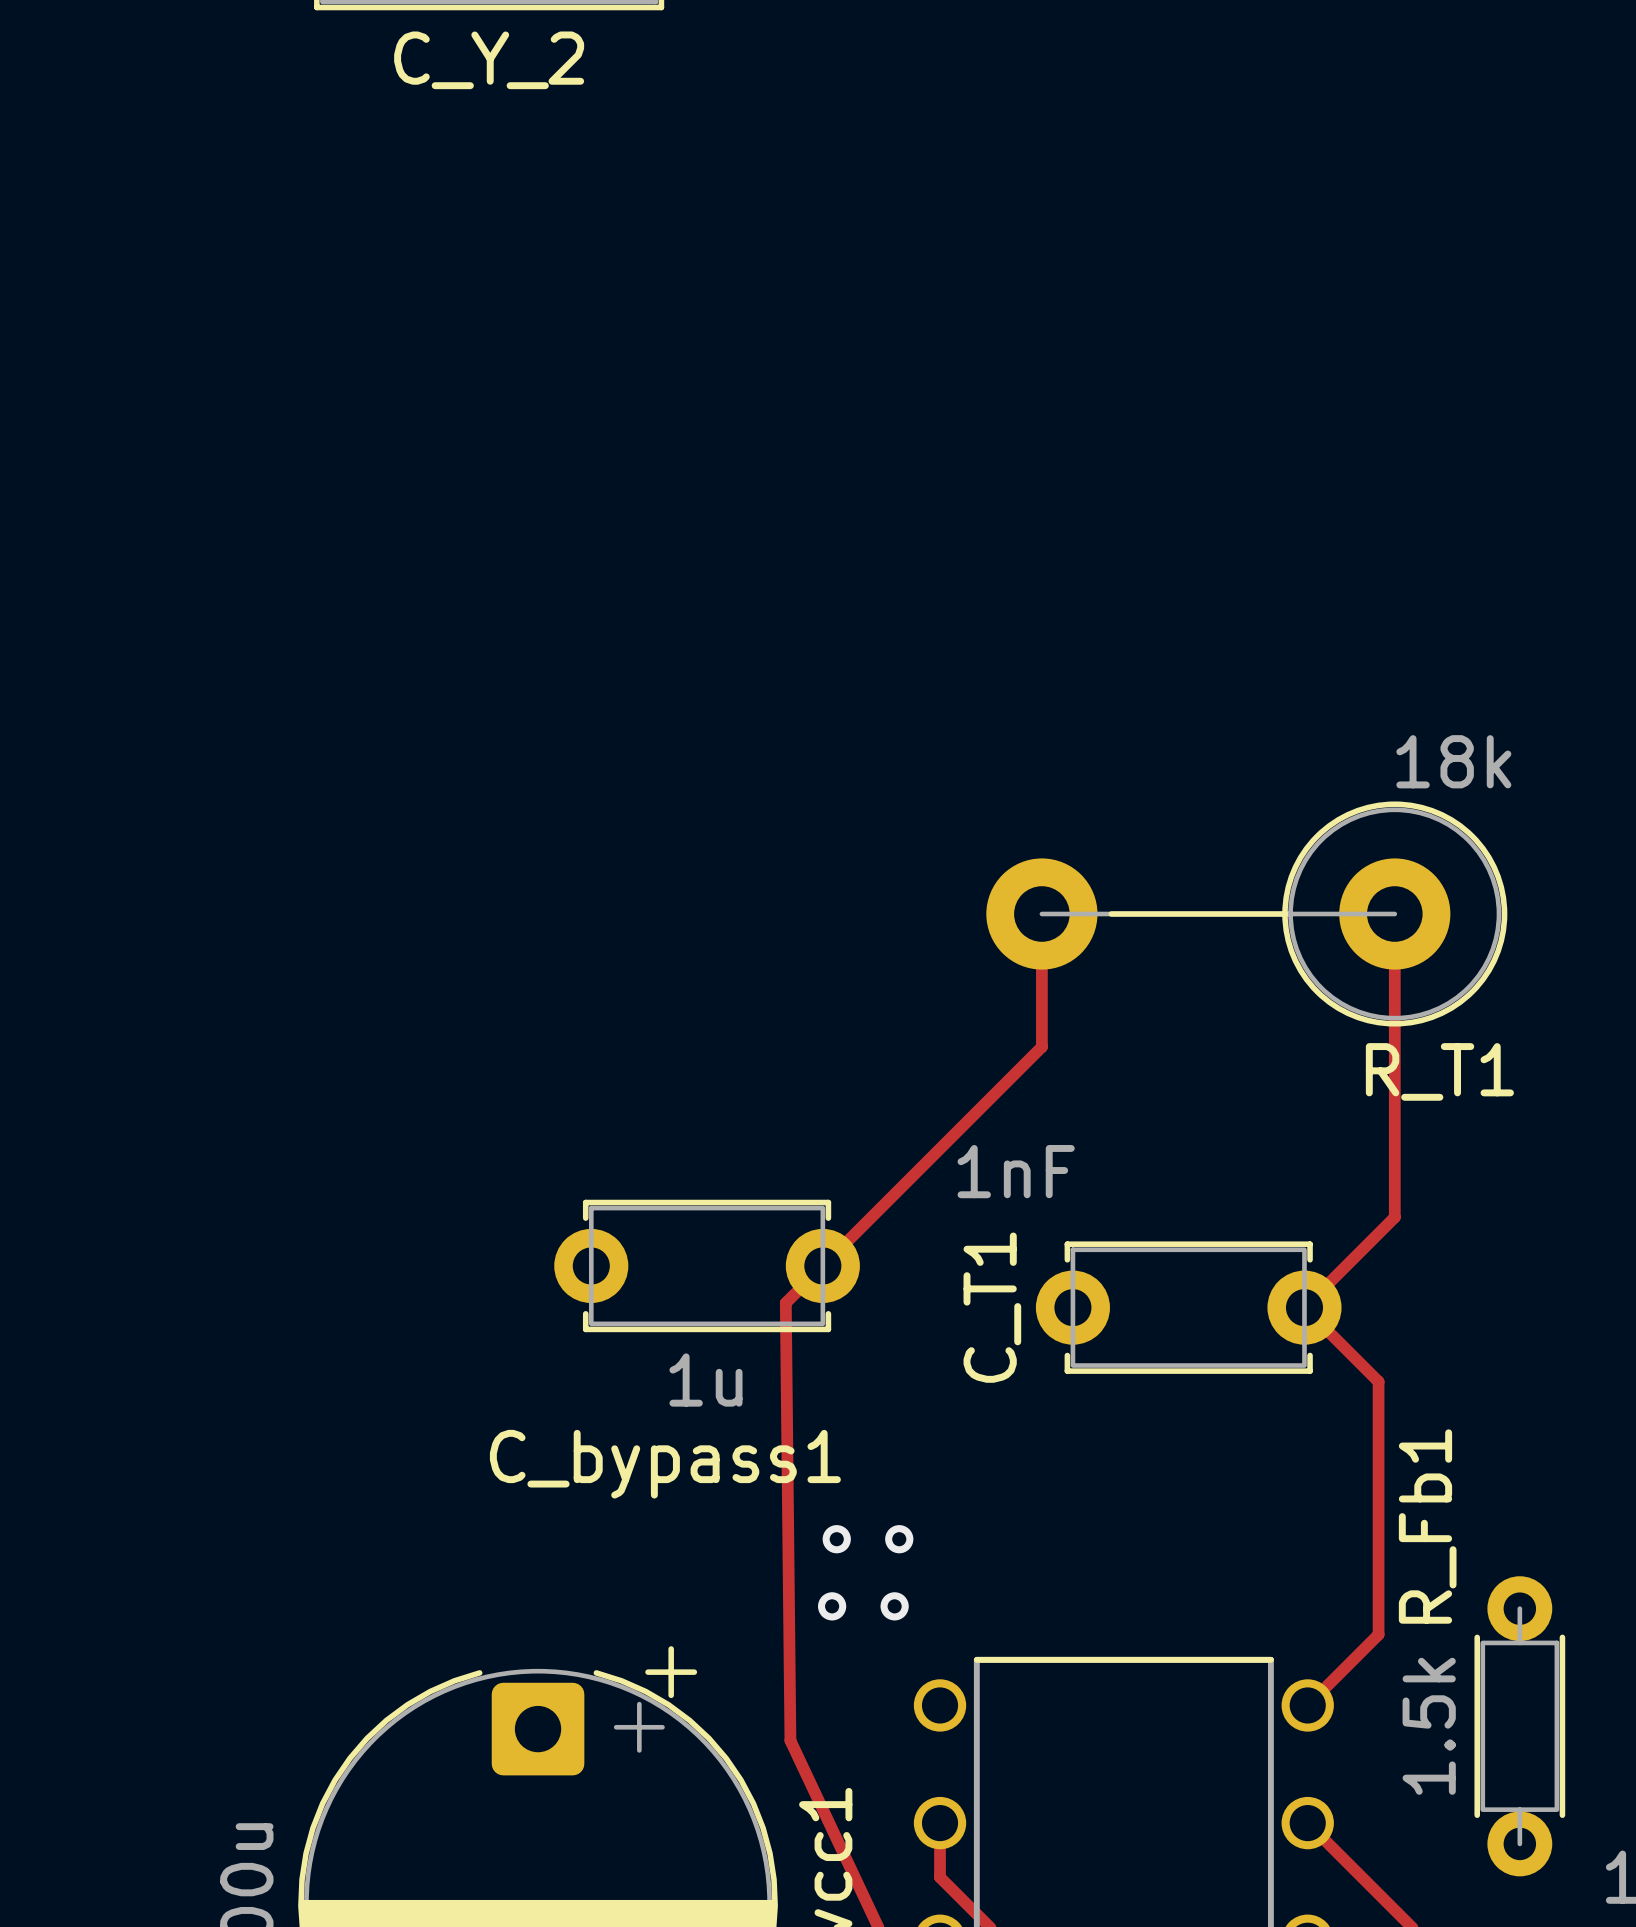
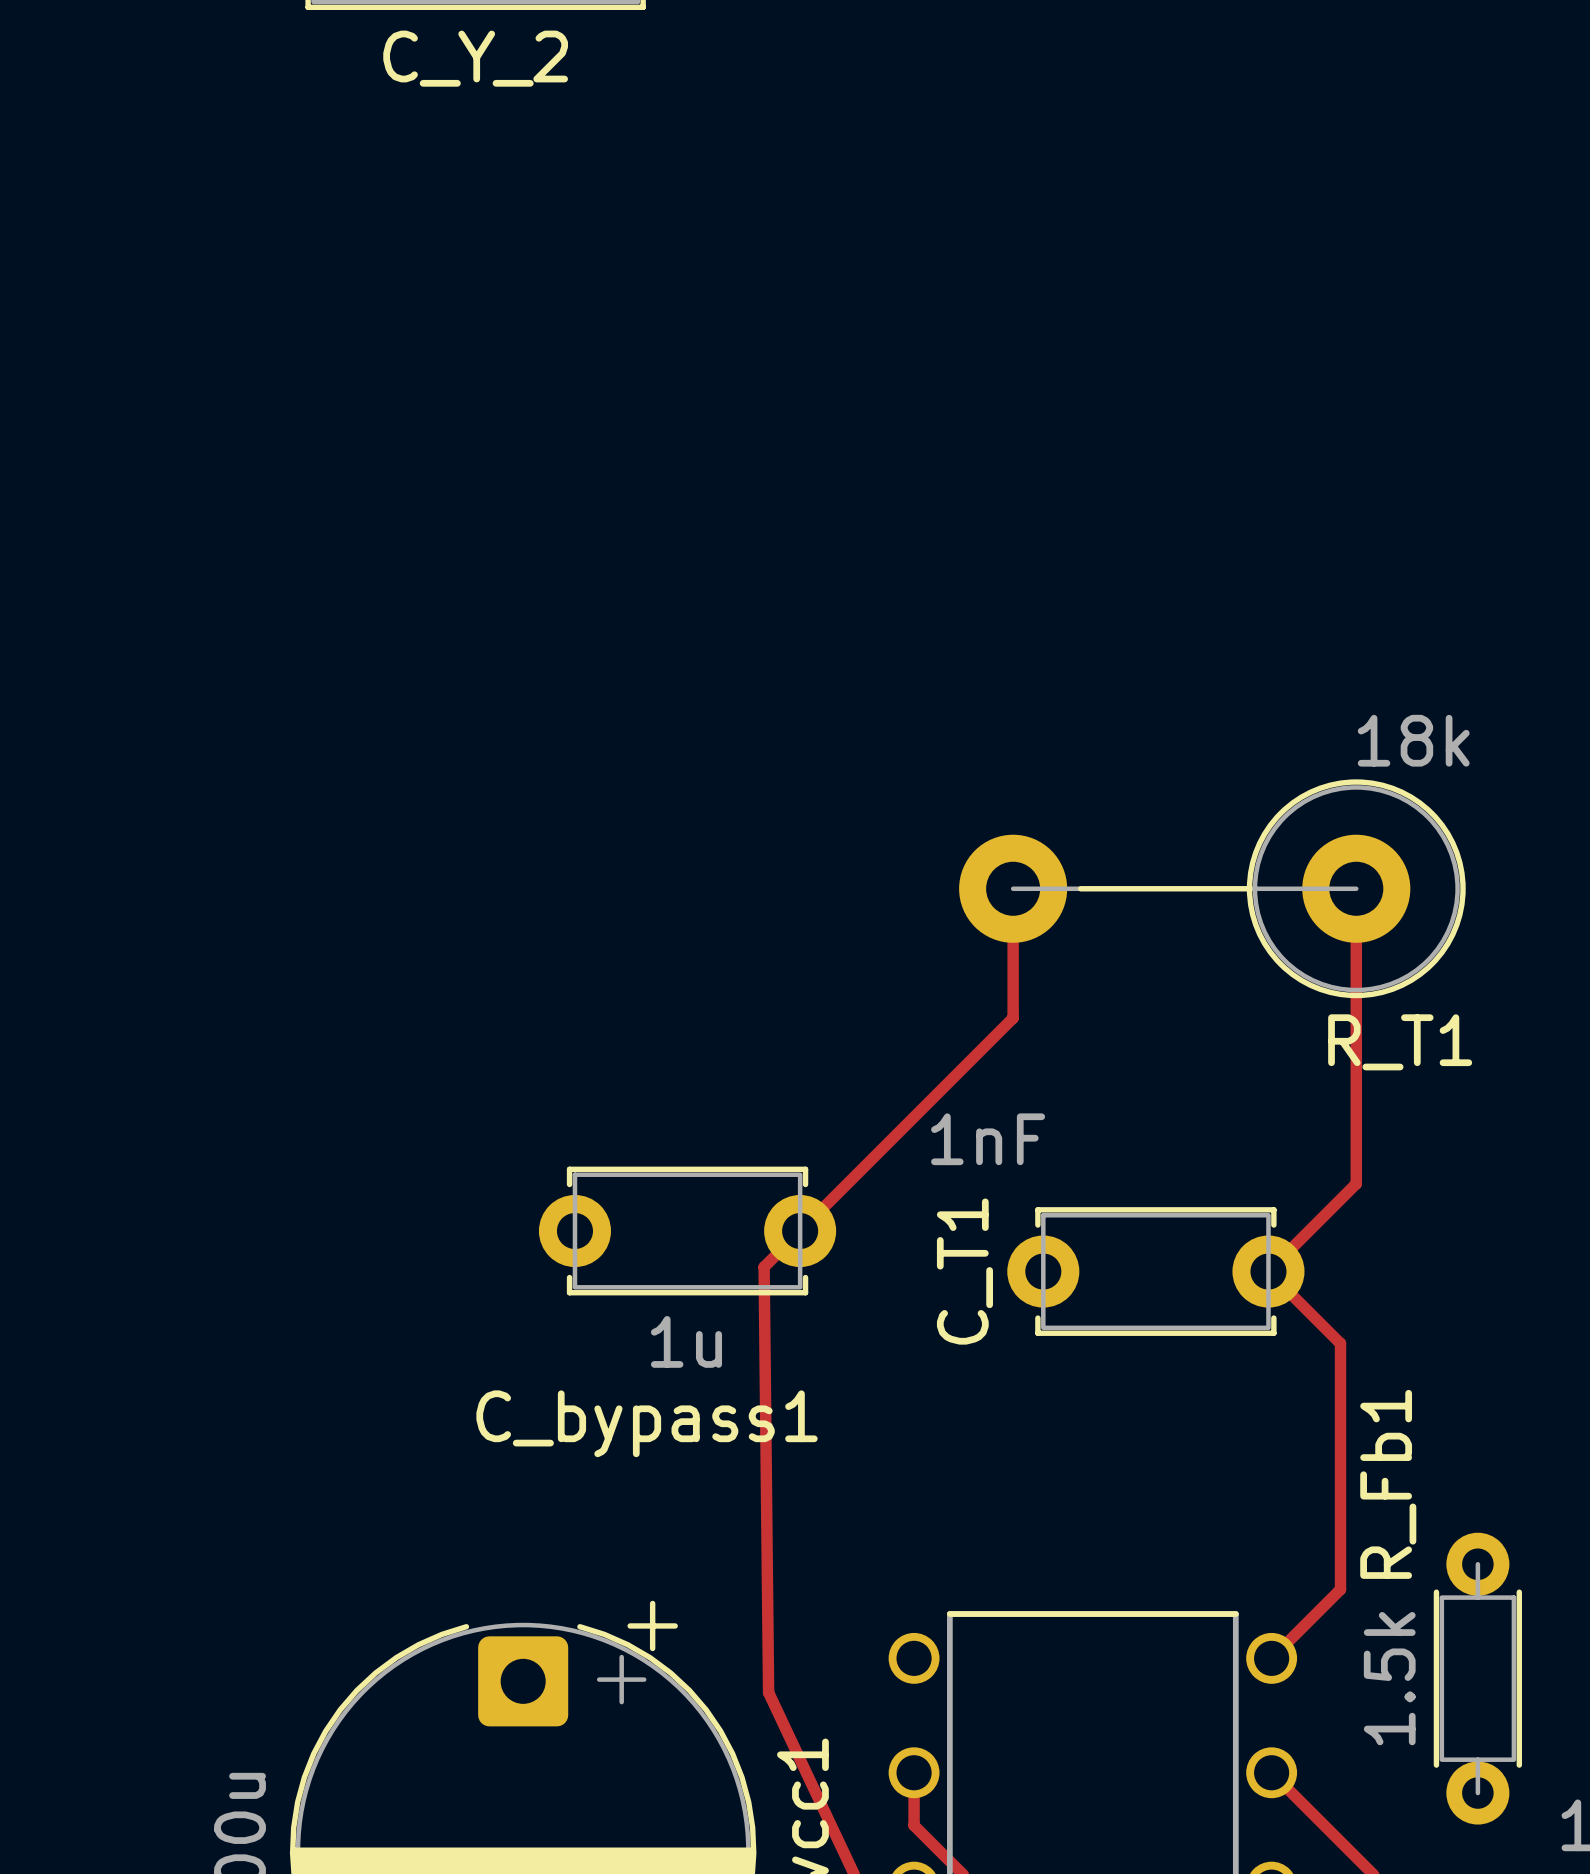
via: (836, 1539) -> none
via: (899, 1539) -> none
via: (832, 1606) -> none
via: (894, 1606) -> none

